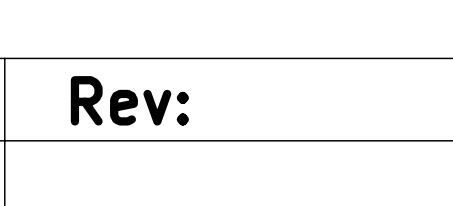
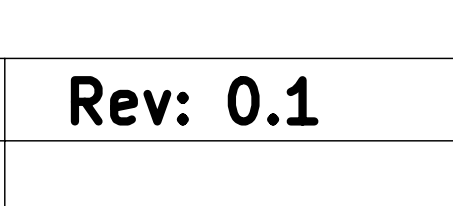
title block: Rev: (129, 100) -> Rev: 0.1 (194, 100)

